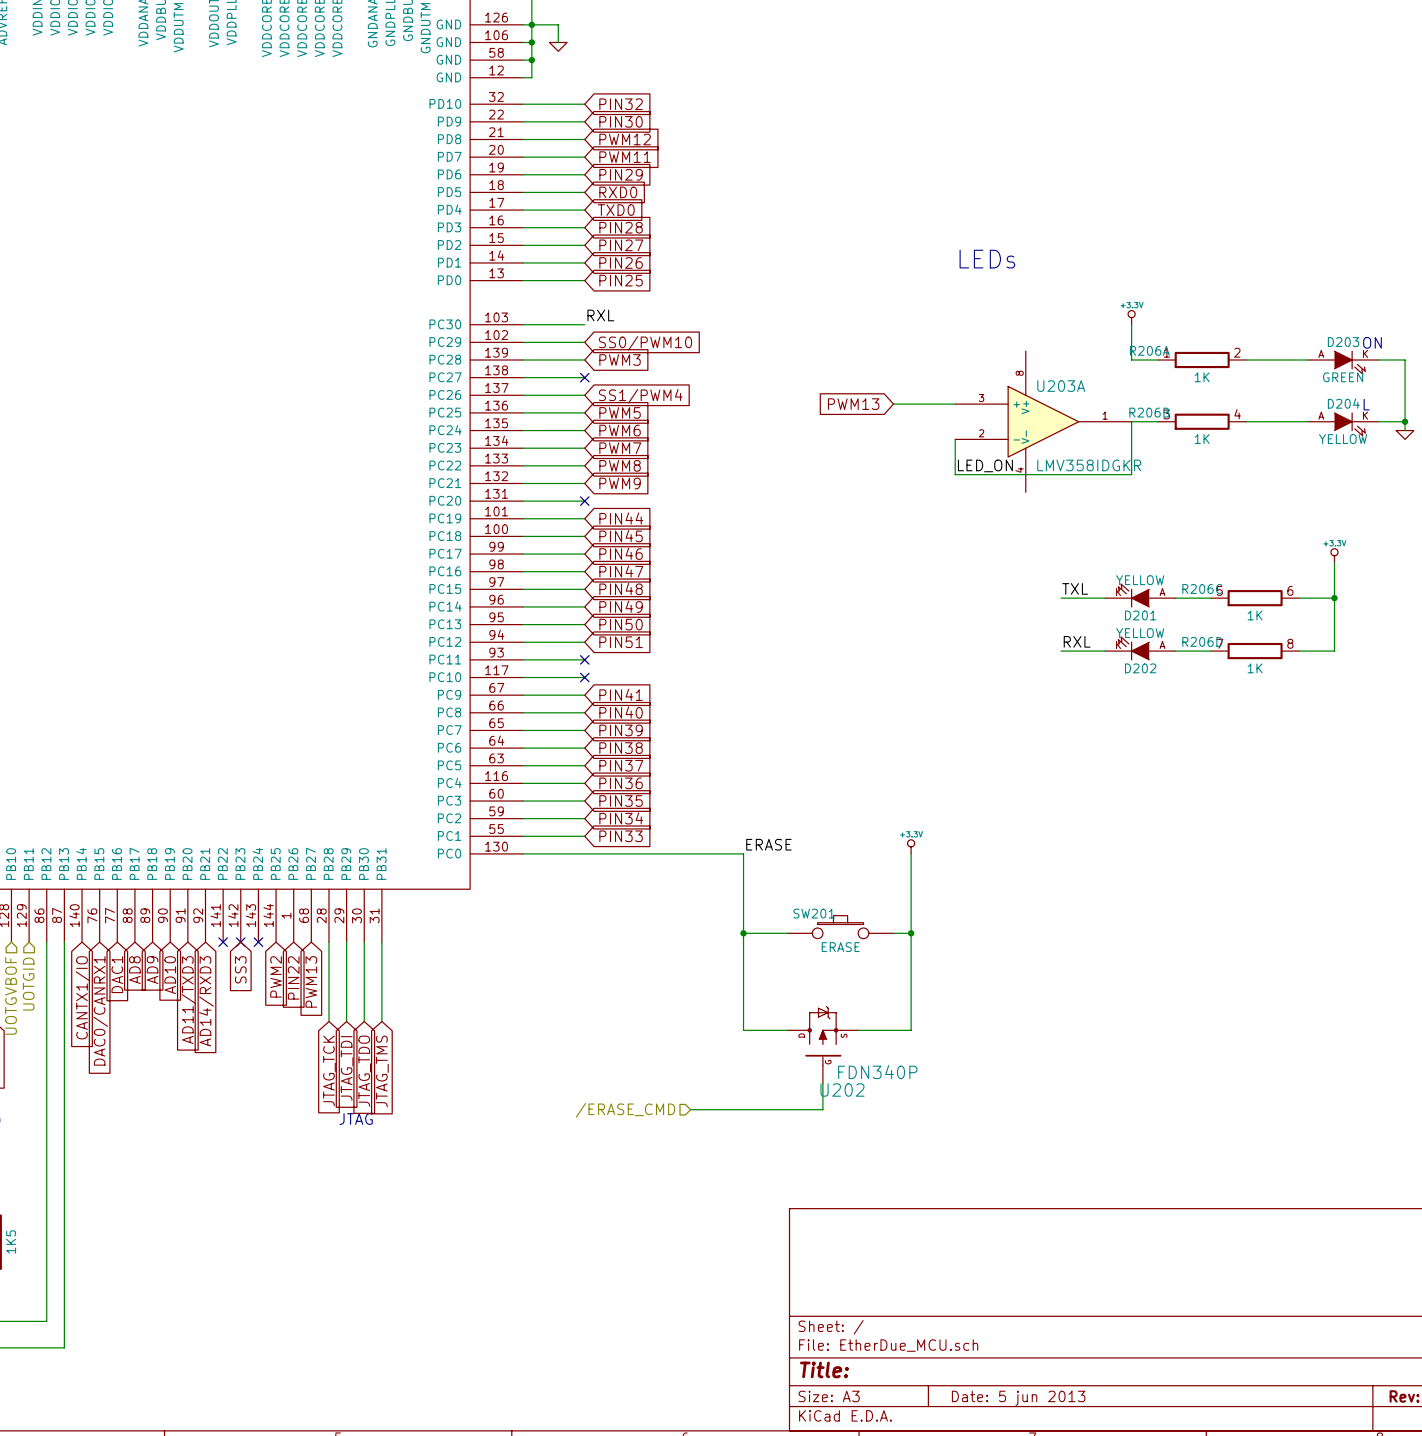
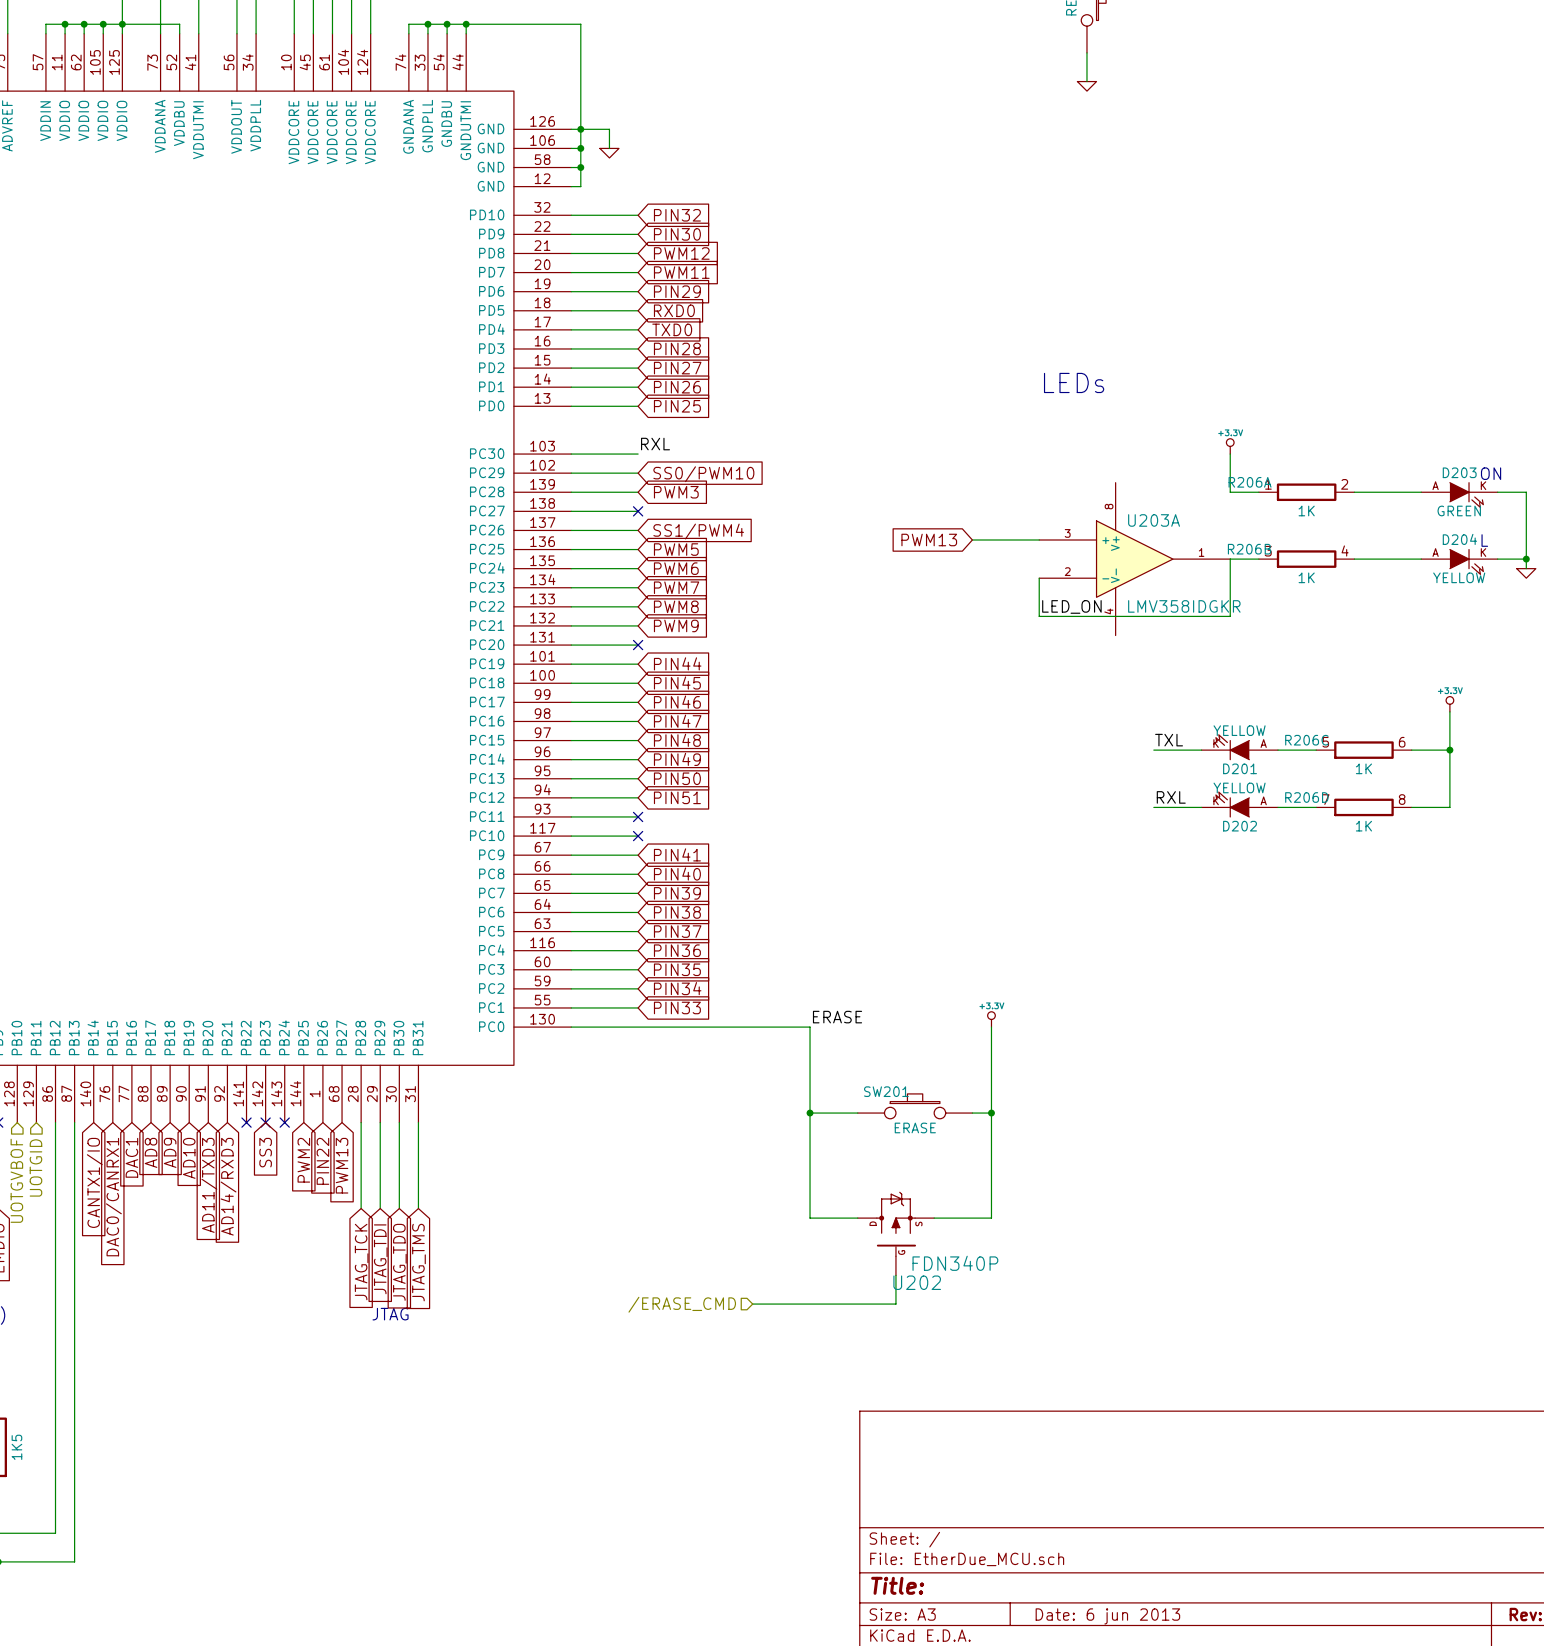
title block: Date: 5 jun 2013 (1018, 1398) -> Date: 6 jun 2013 (1107, 1616)

